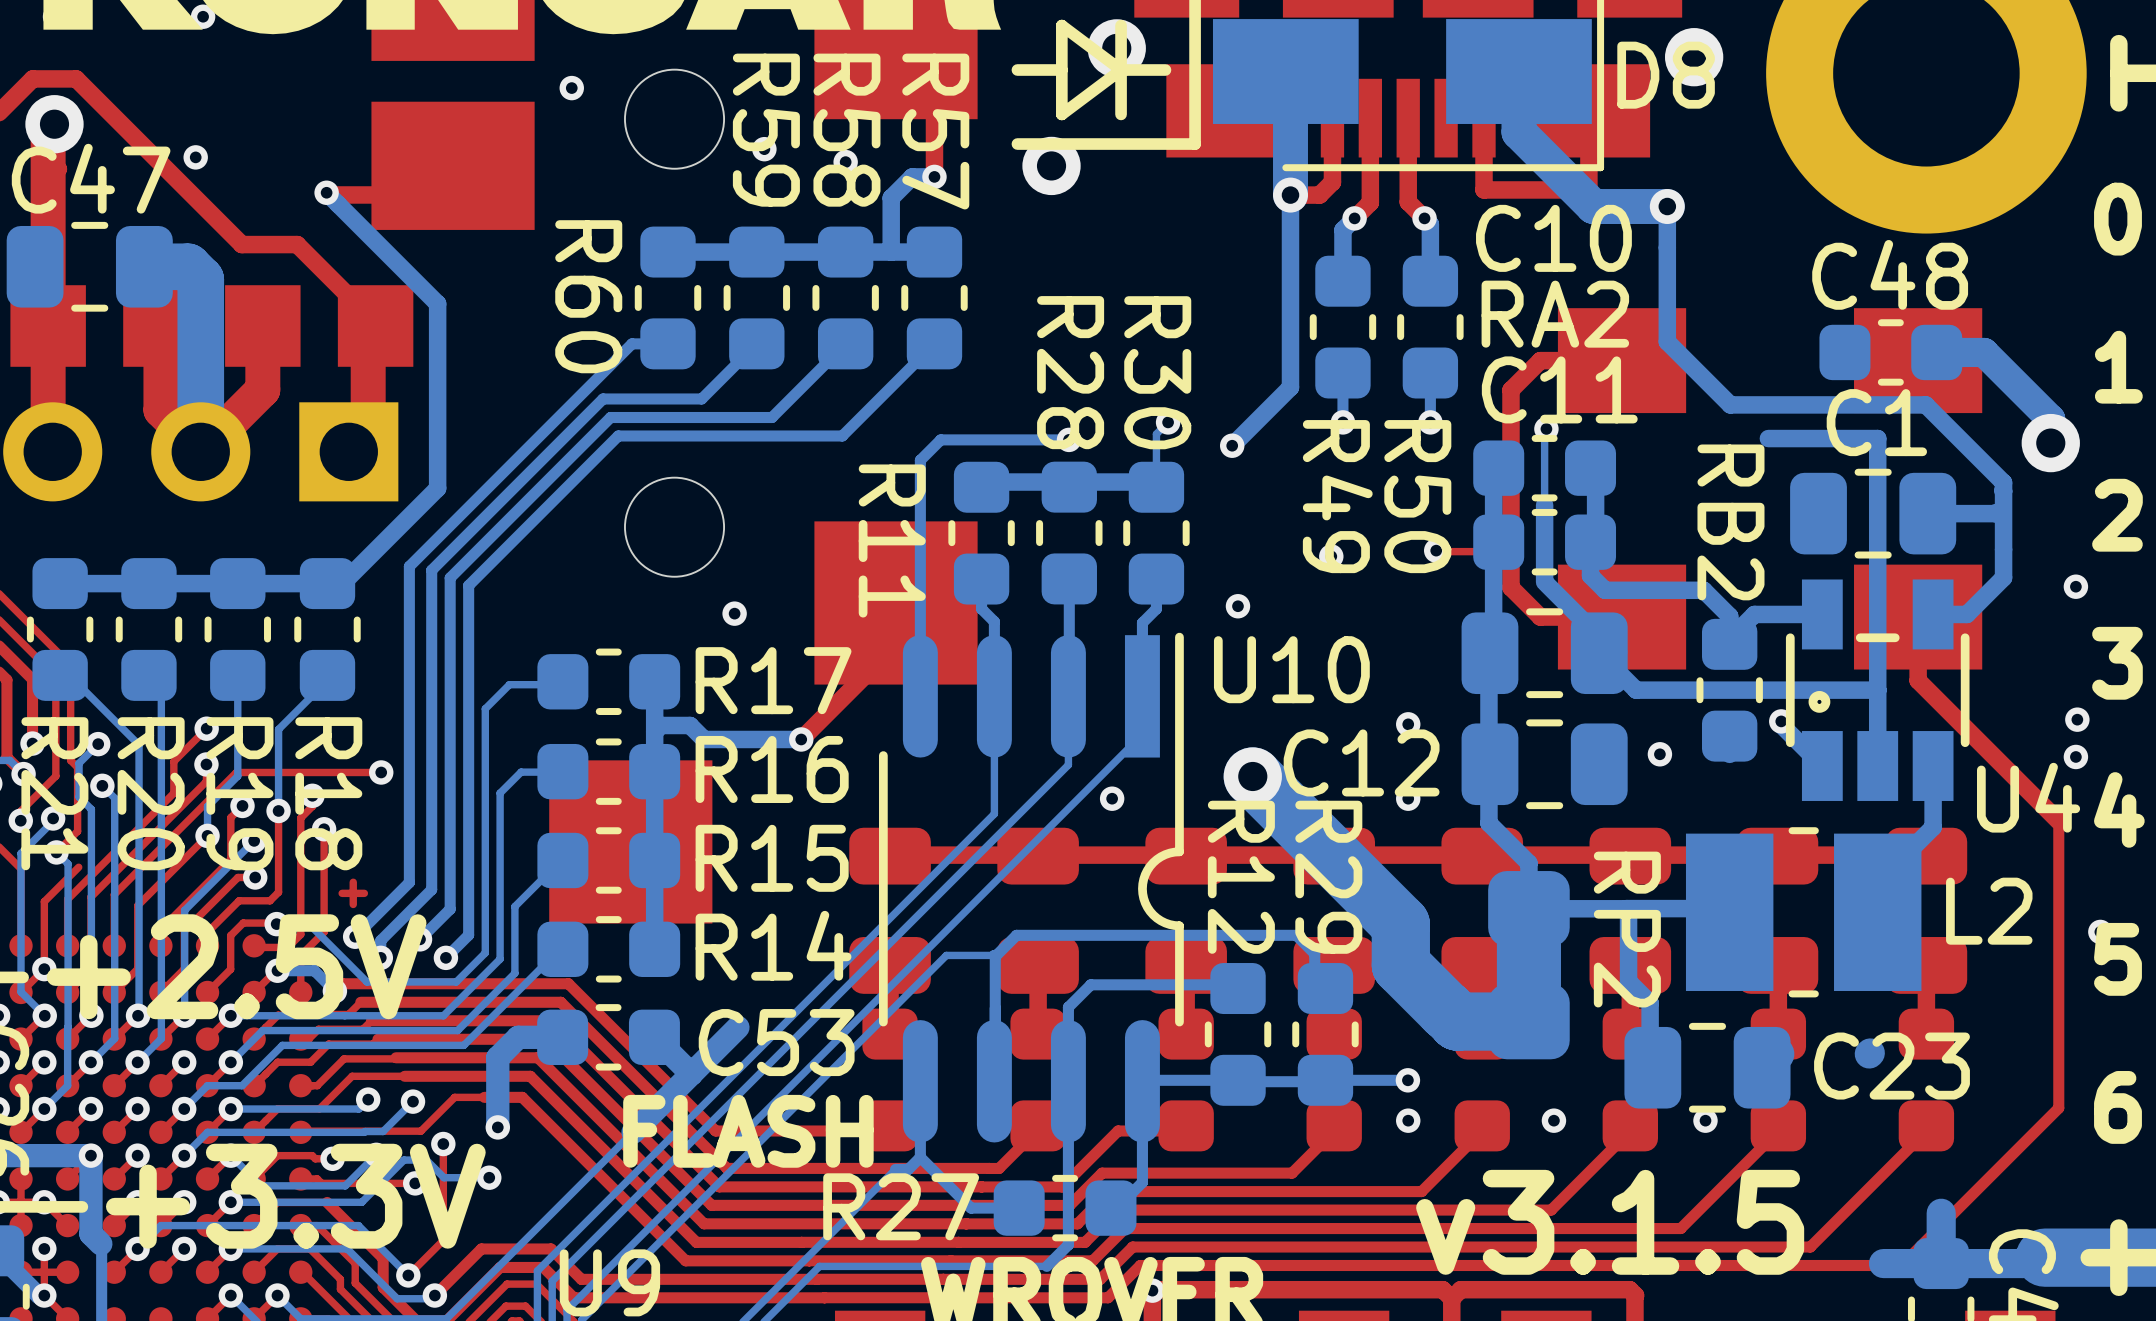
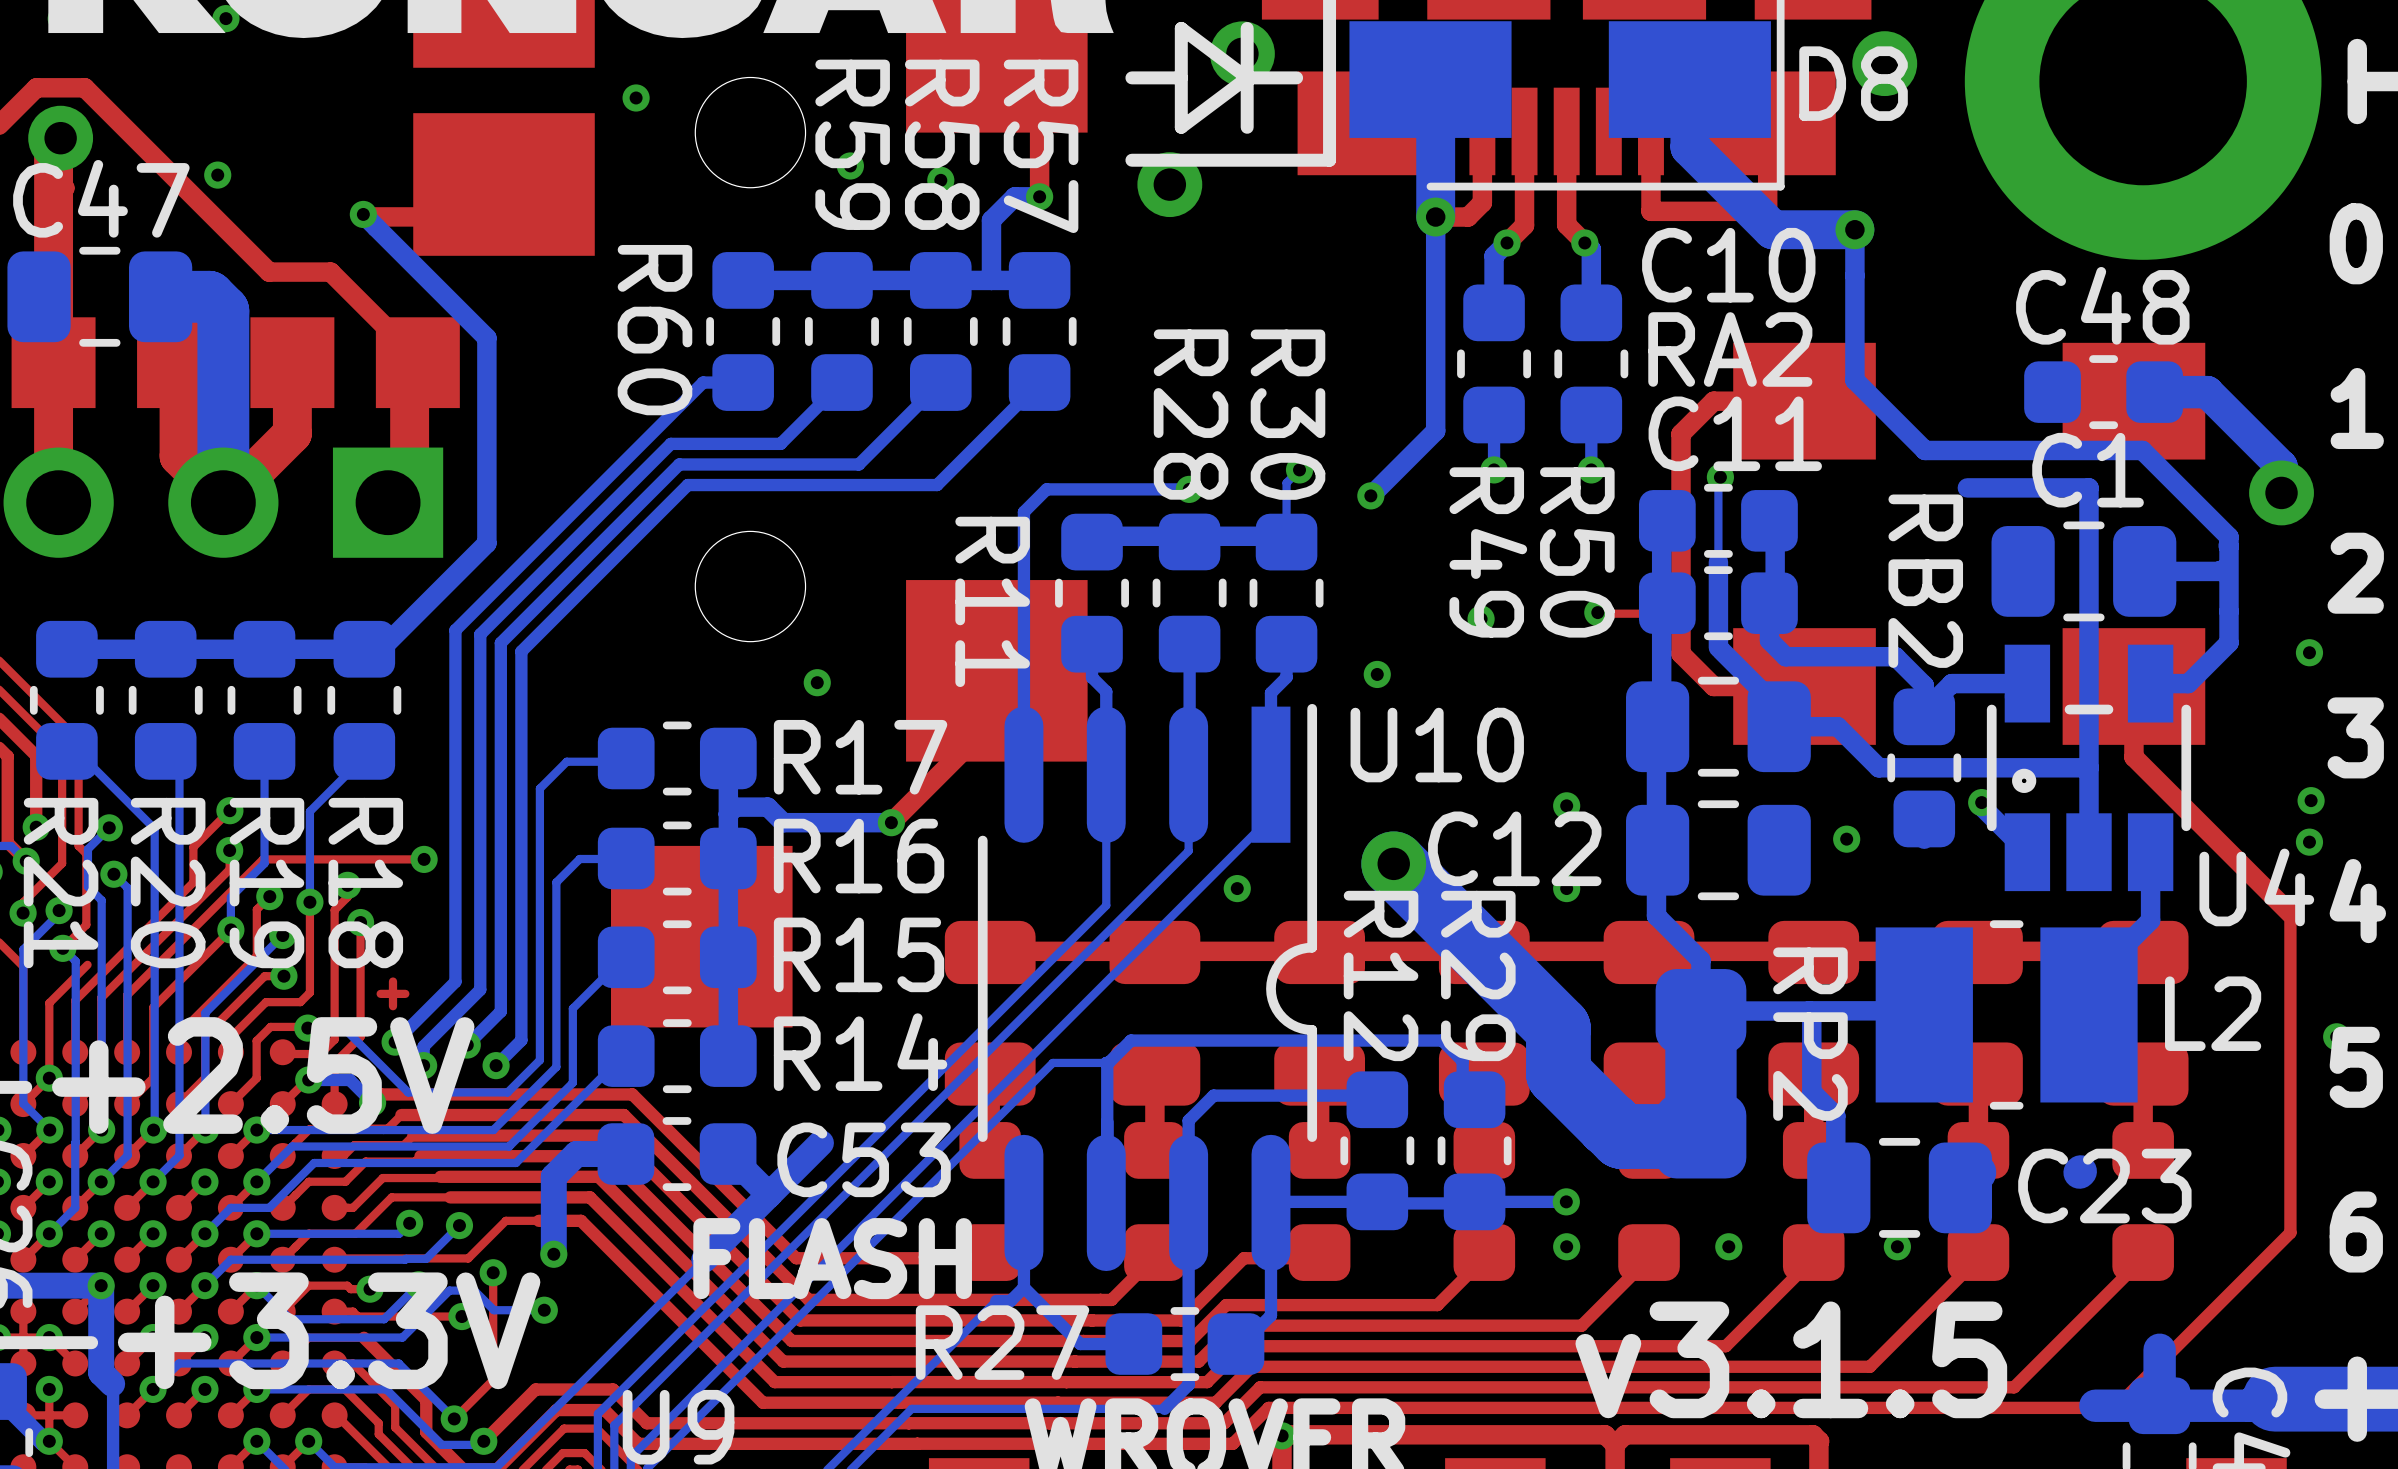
bottom track: (1599, 653) (1636, 690) (1688, 690) -> (1779, 726) (1837, 726) (1878, 767)

